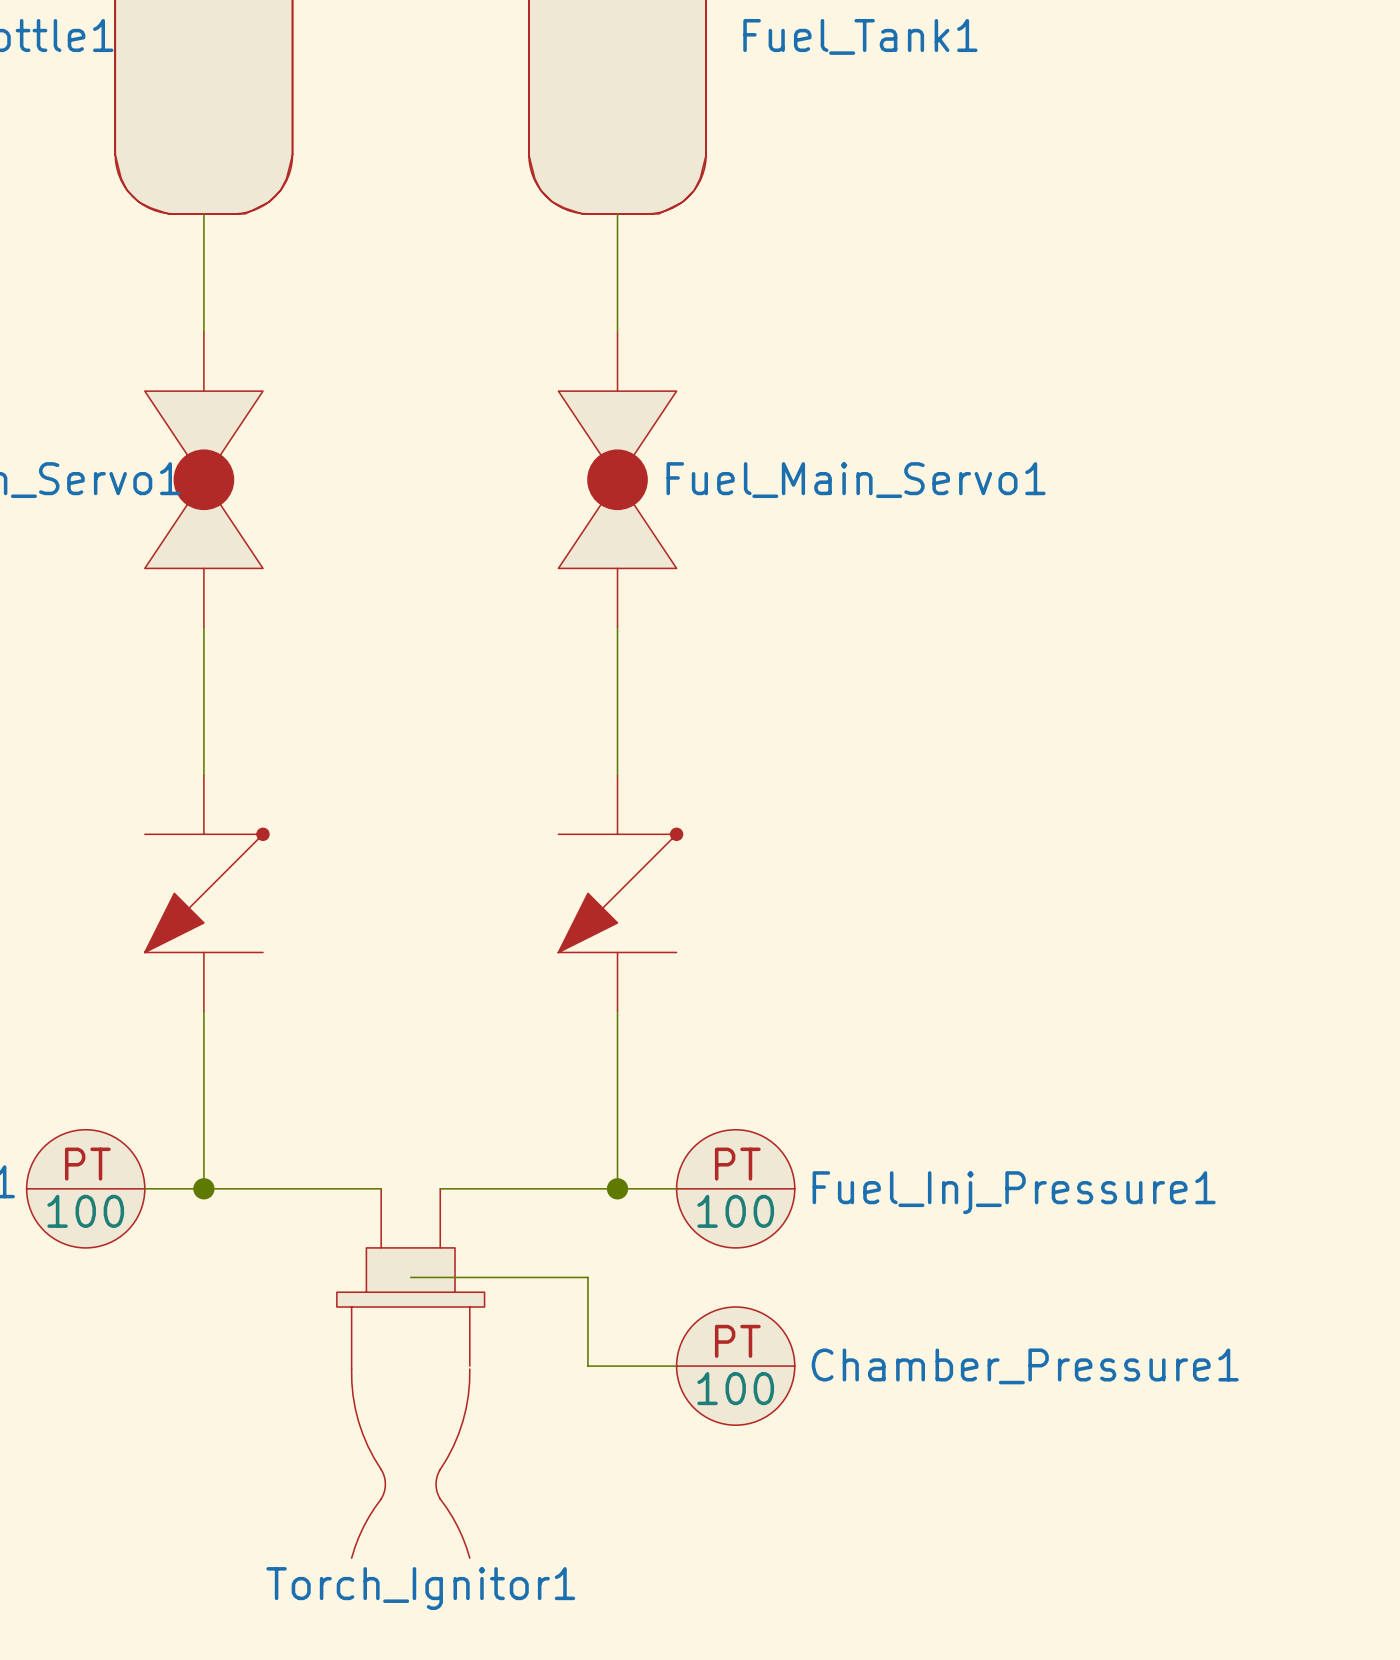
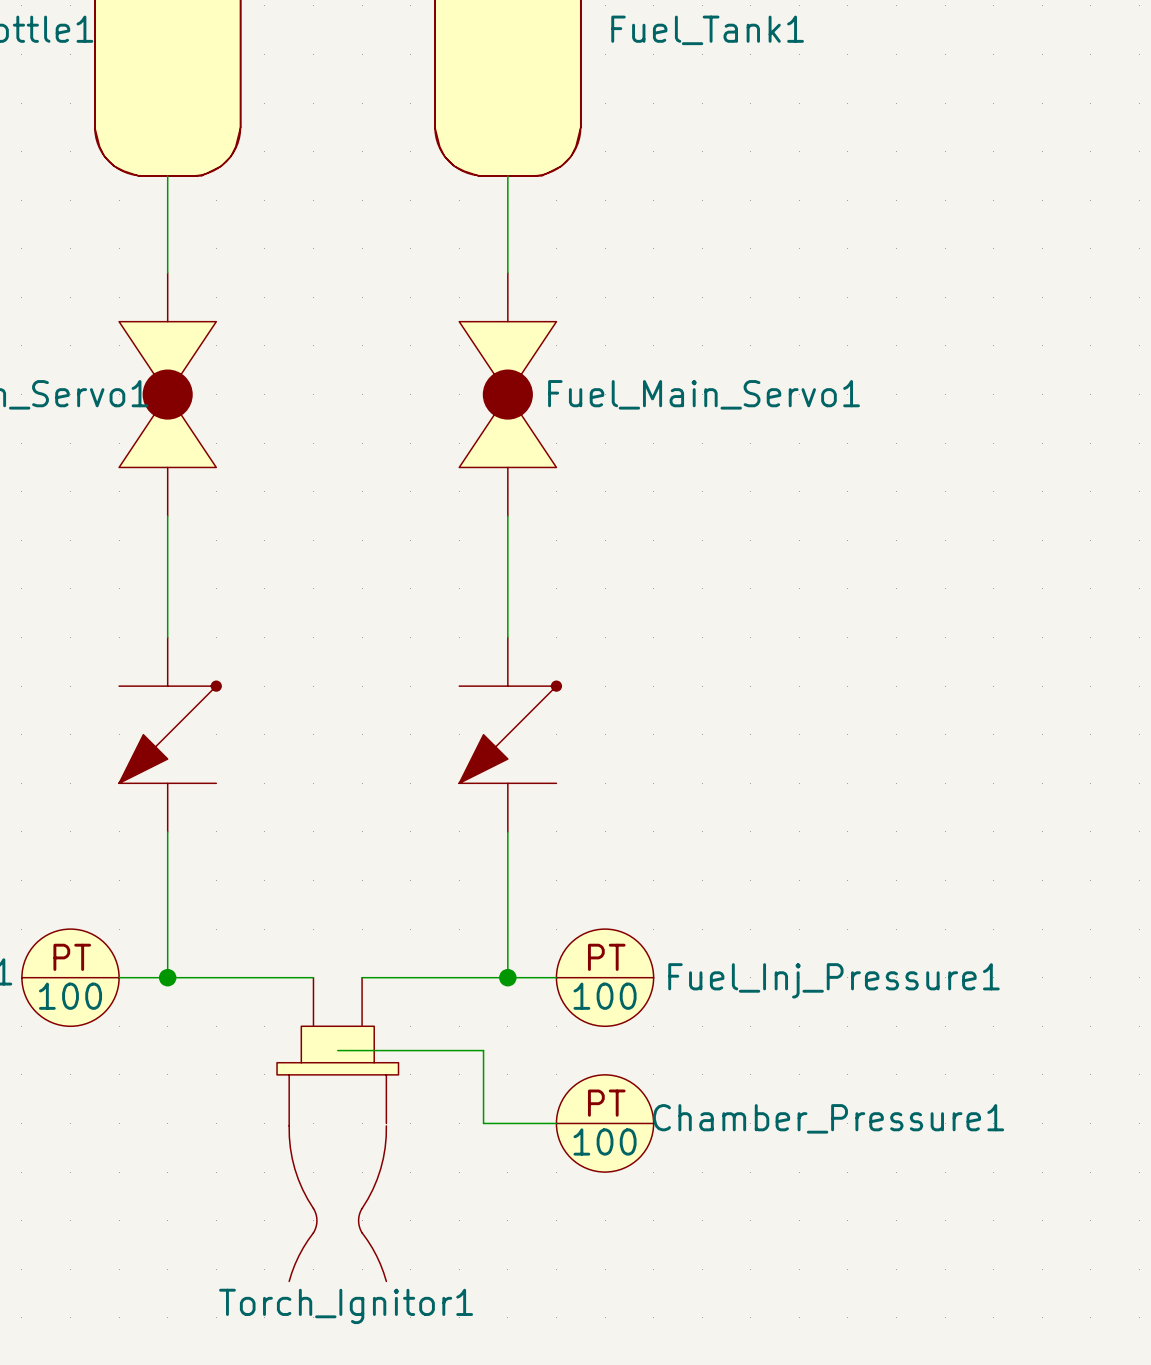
Chamber_Pressure1 name position: Chamber_Pressure1 (1025, 1366) -> Chamber_Pressure1 (828, 1118)

